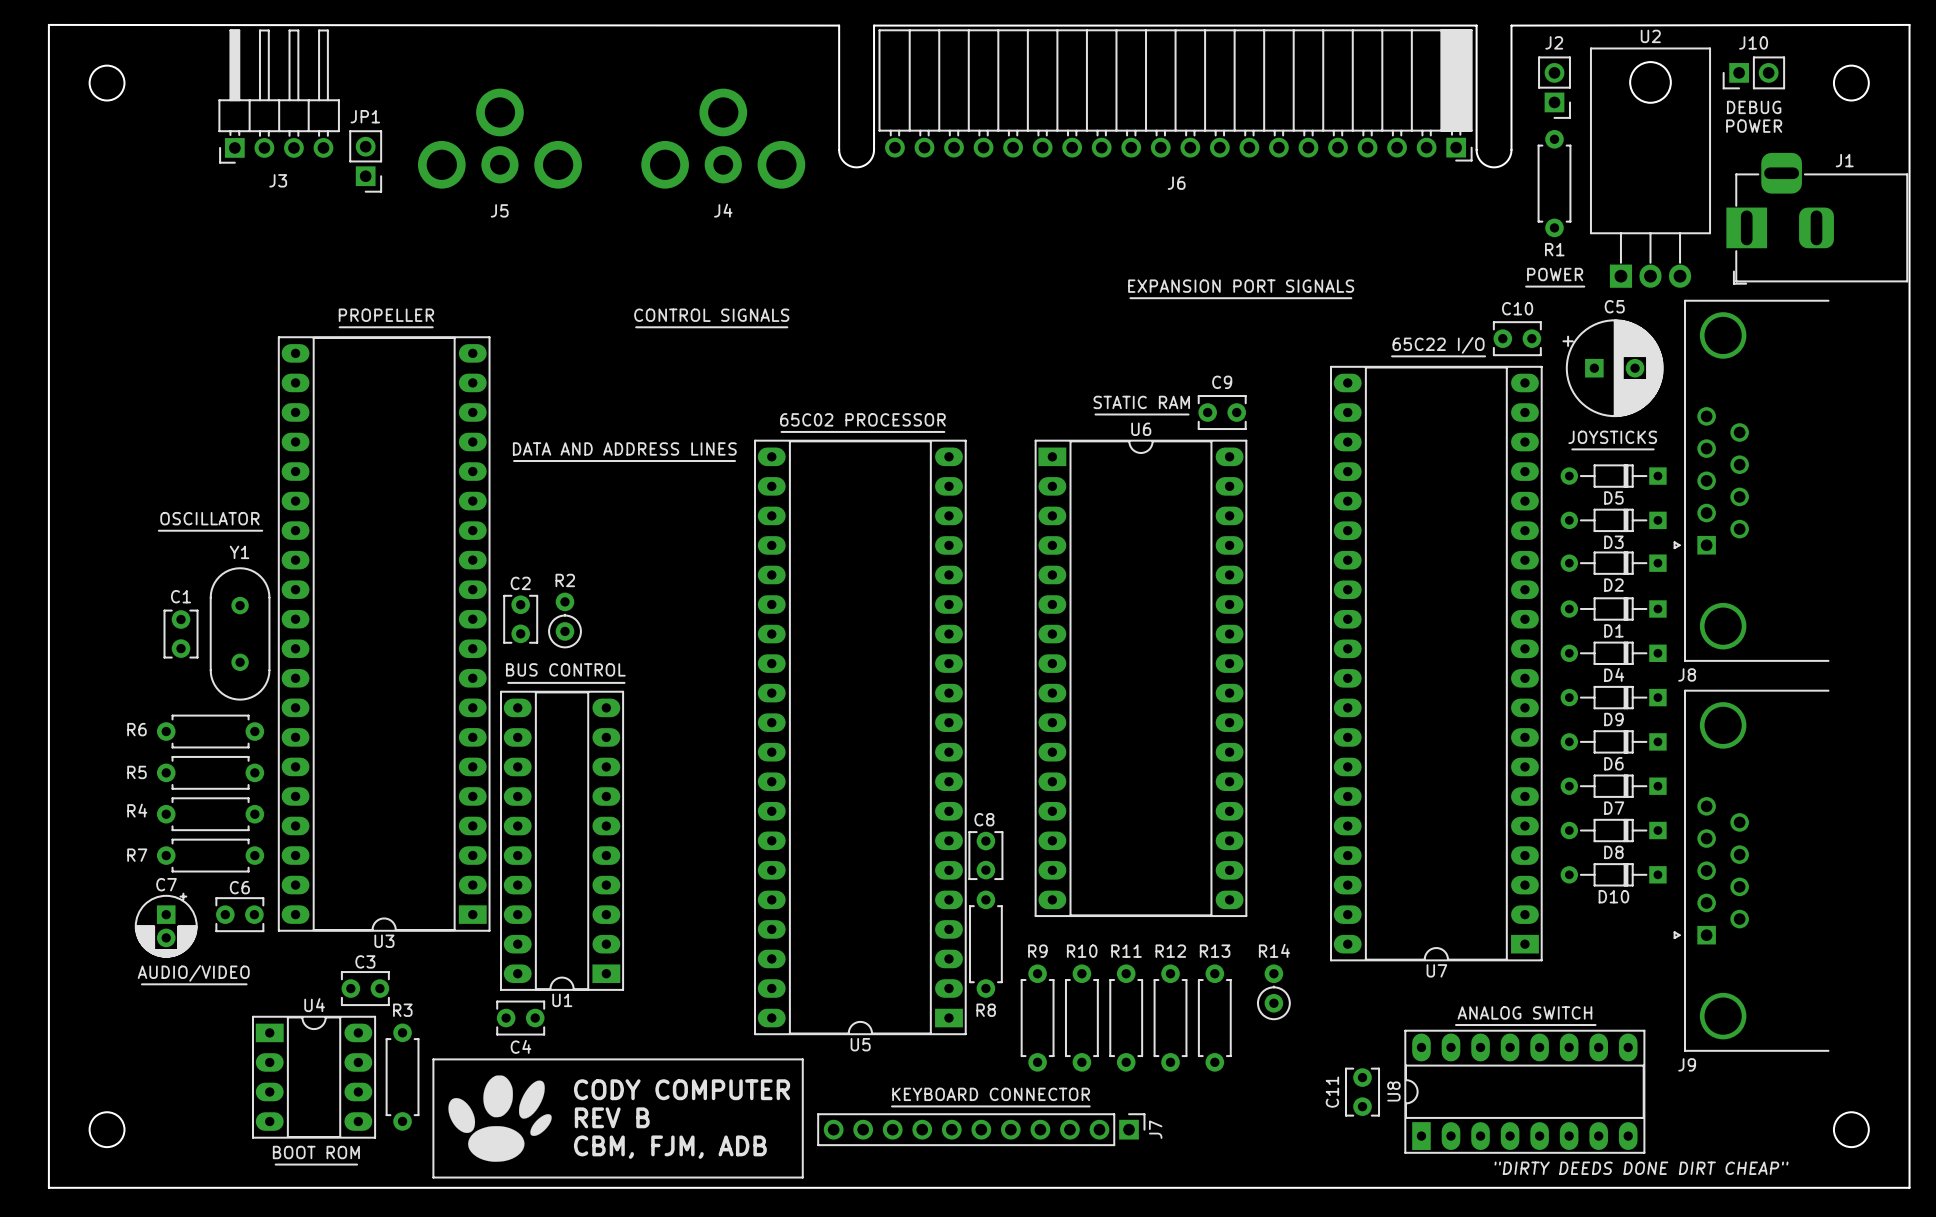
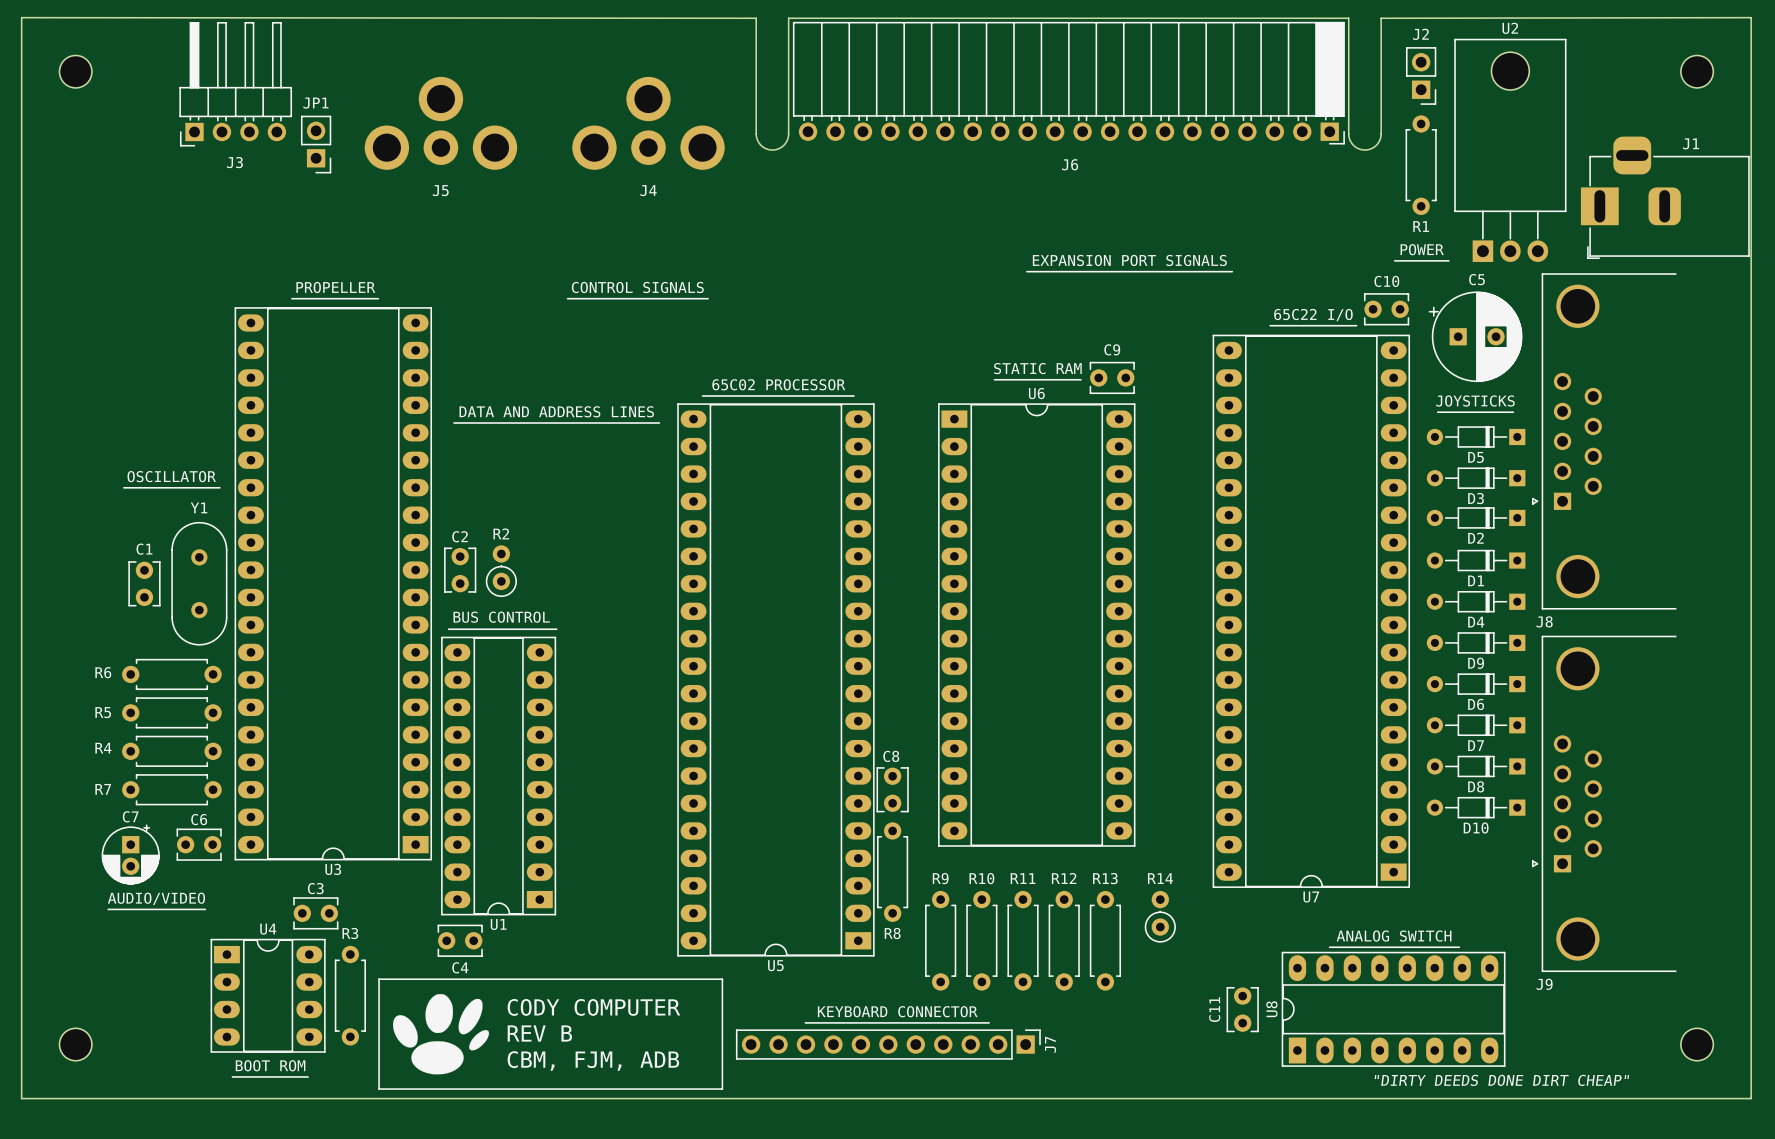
J10: (1753, 72) -> none
text: DEBUG (1754, 107) -> none
text: POWER (1754, 126) -> none

